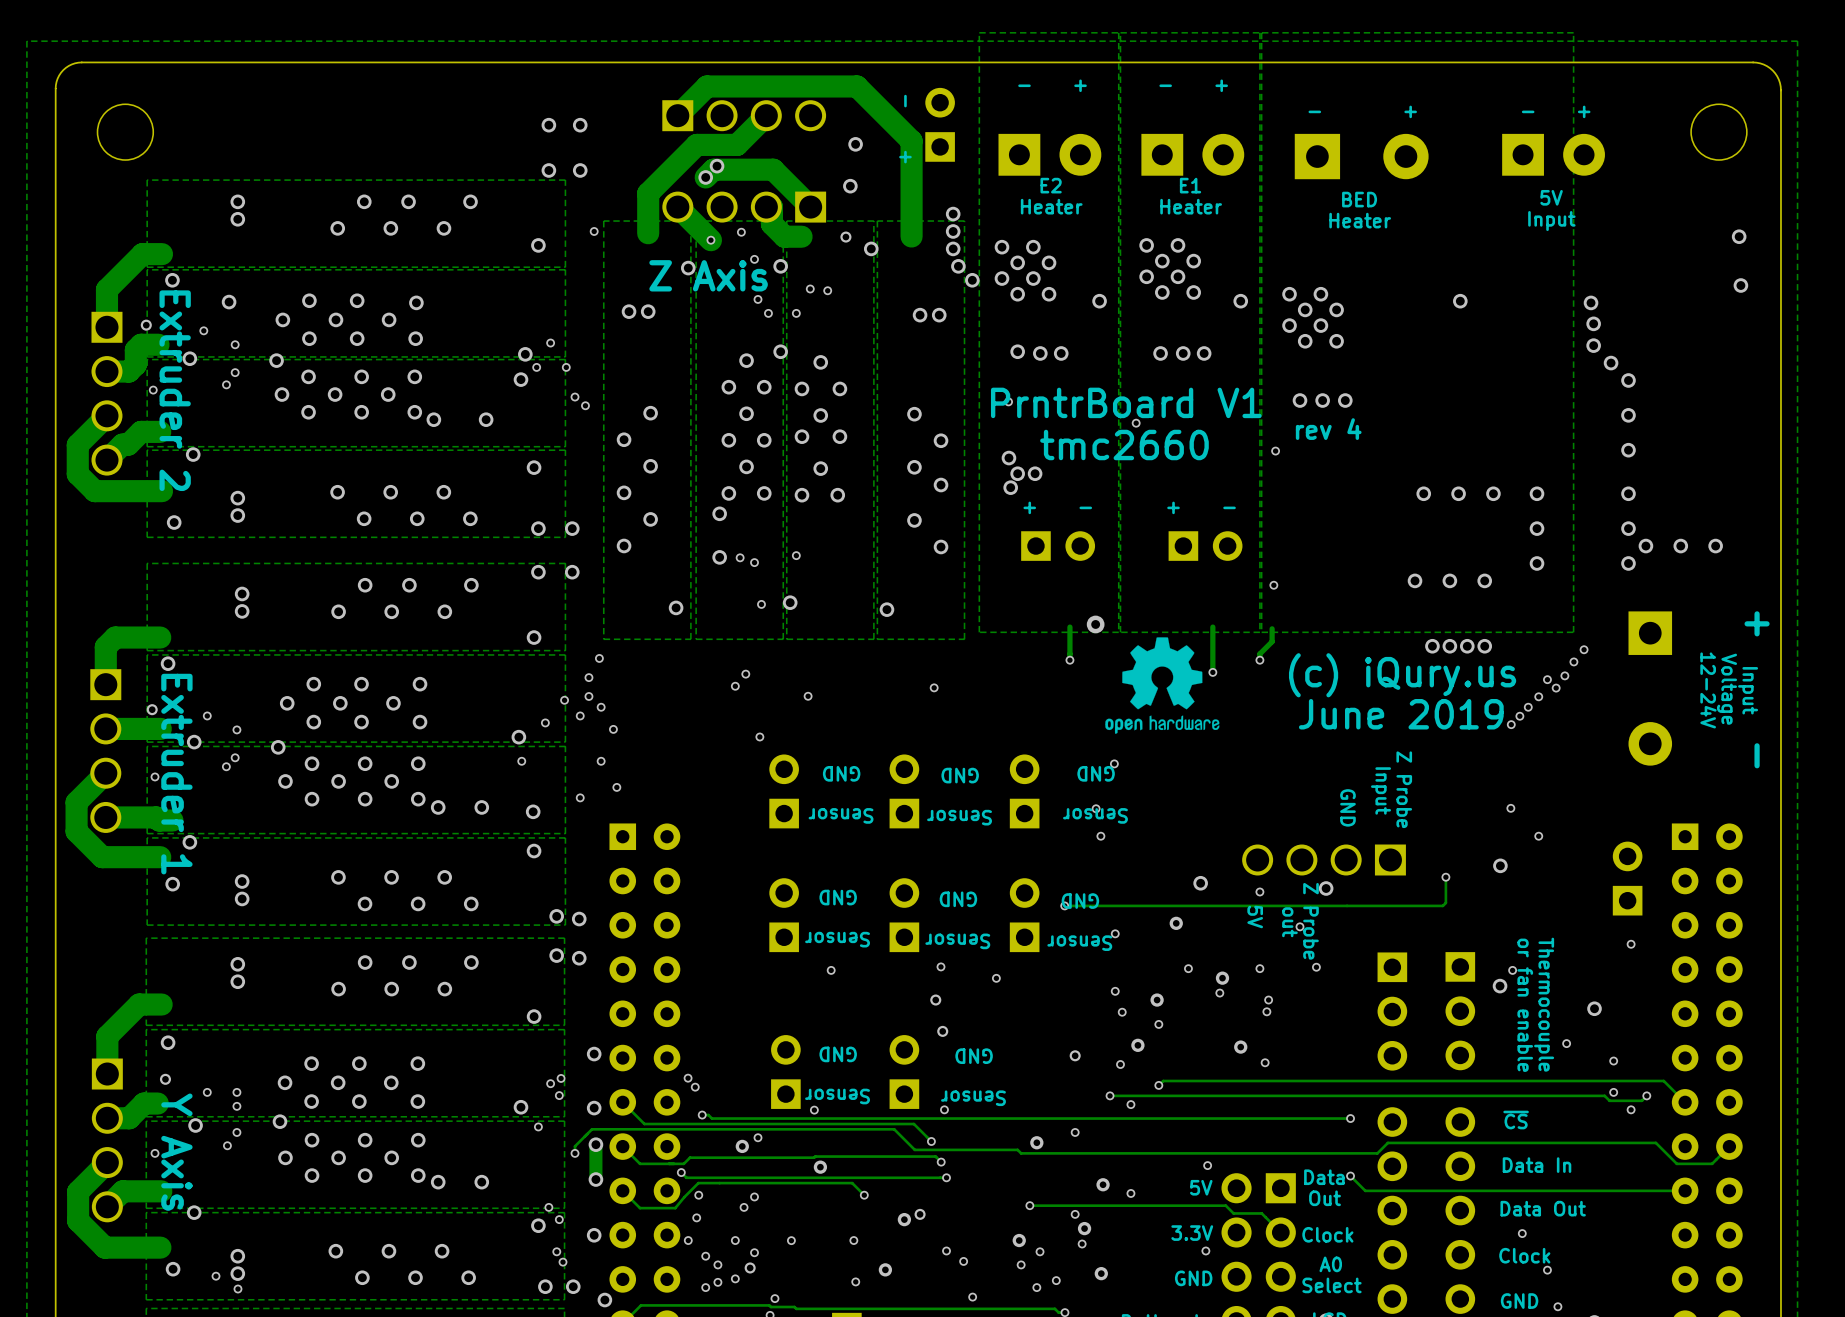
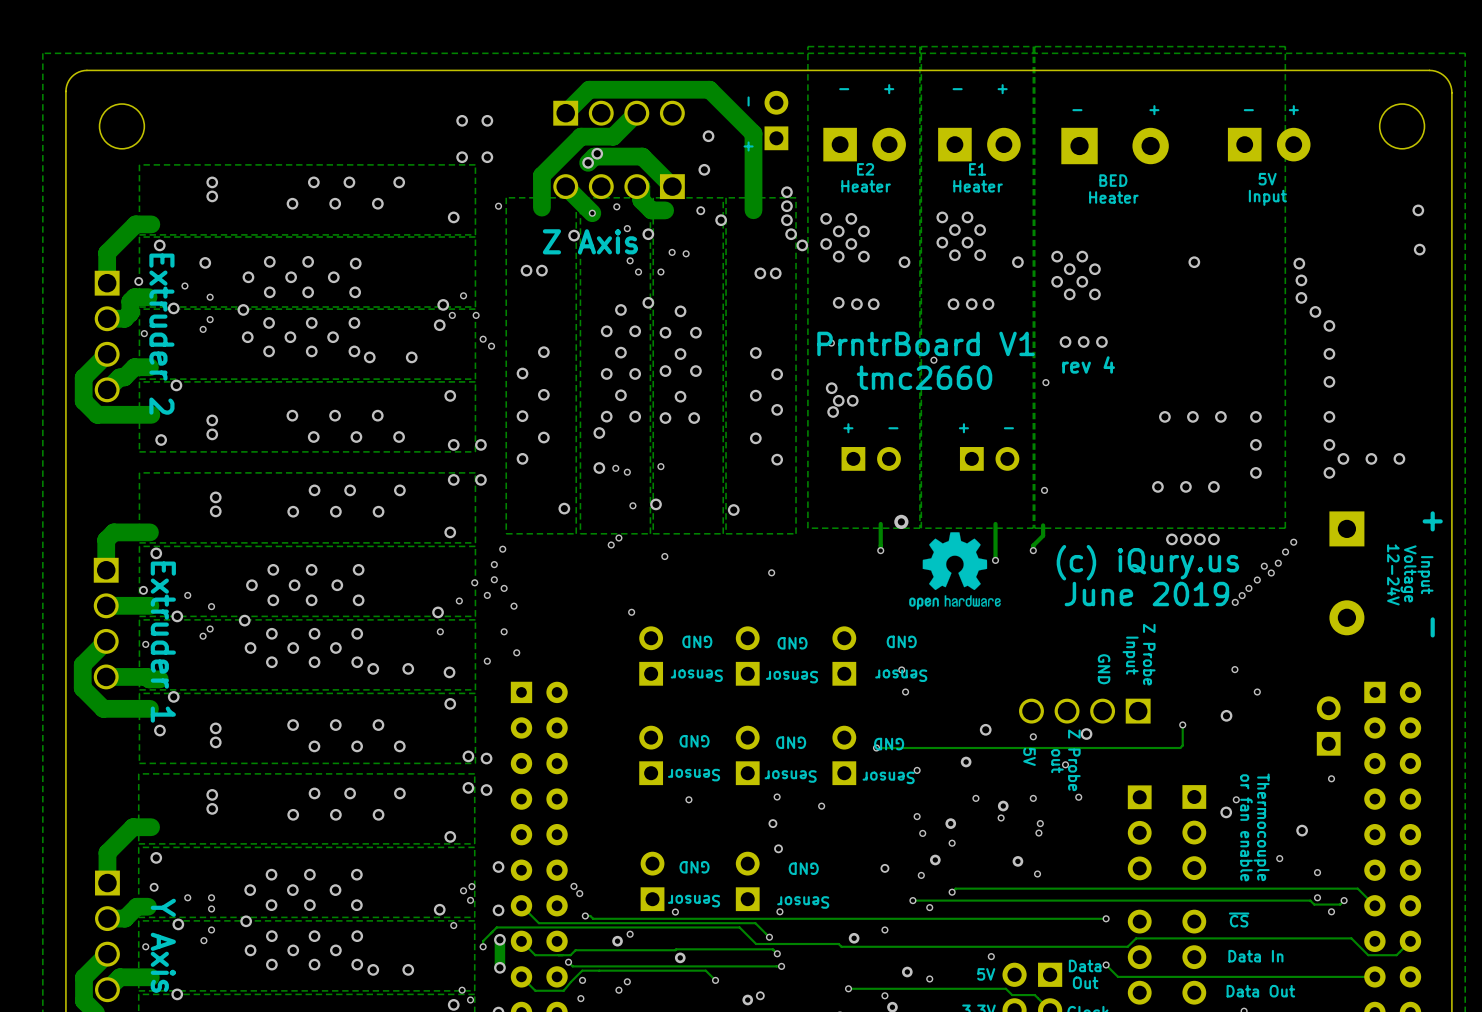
via: none -> (618, 538)
via: none -> (611, 545)
via: none -> (664, 556)
via: (745, 674) -> none
via: (735, 686) -> none
via: (808, 696) -> none
via: (1114, 763) -> none

